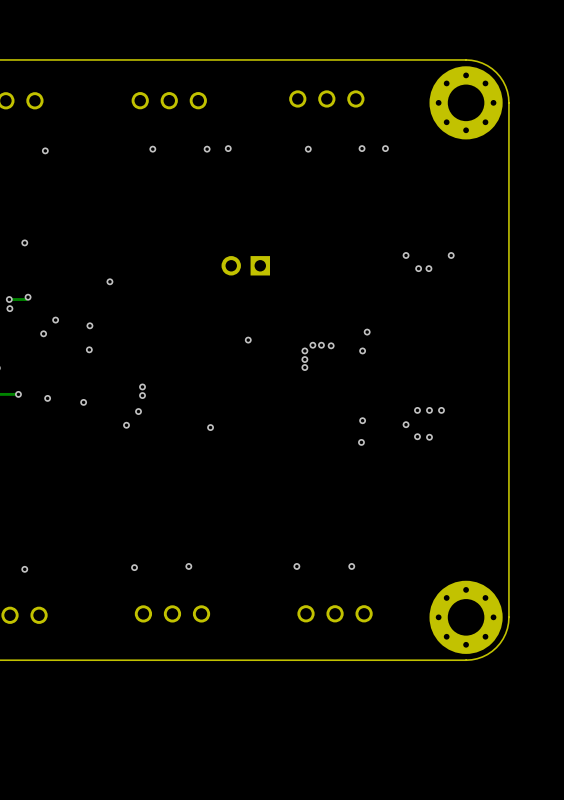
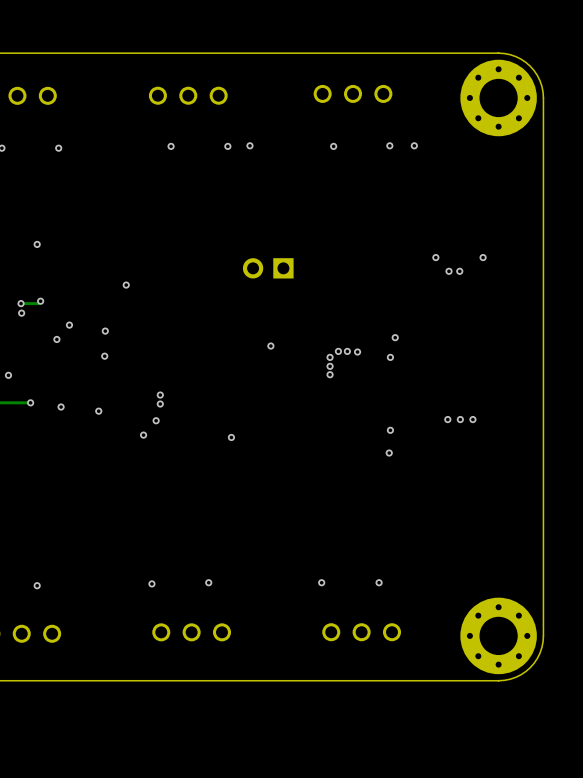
via: (406, 424) -> none
via: (417, 436) -> none
via: (429, 437) -> none

